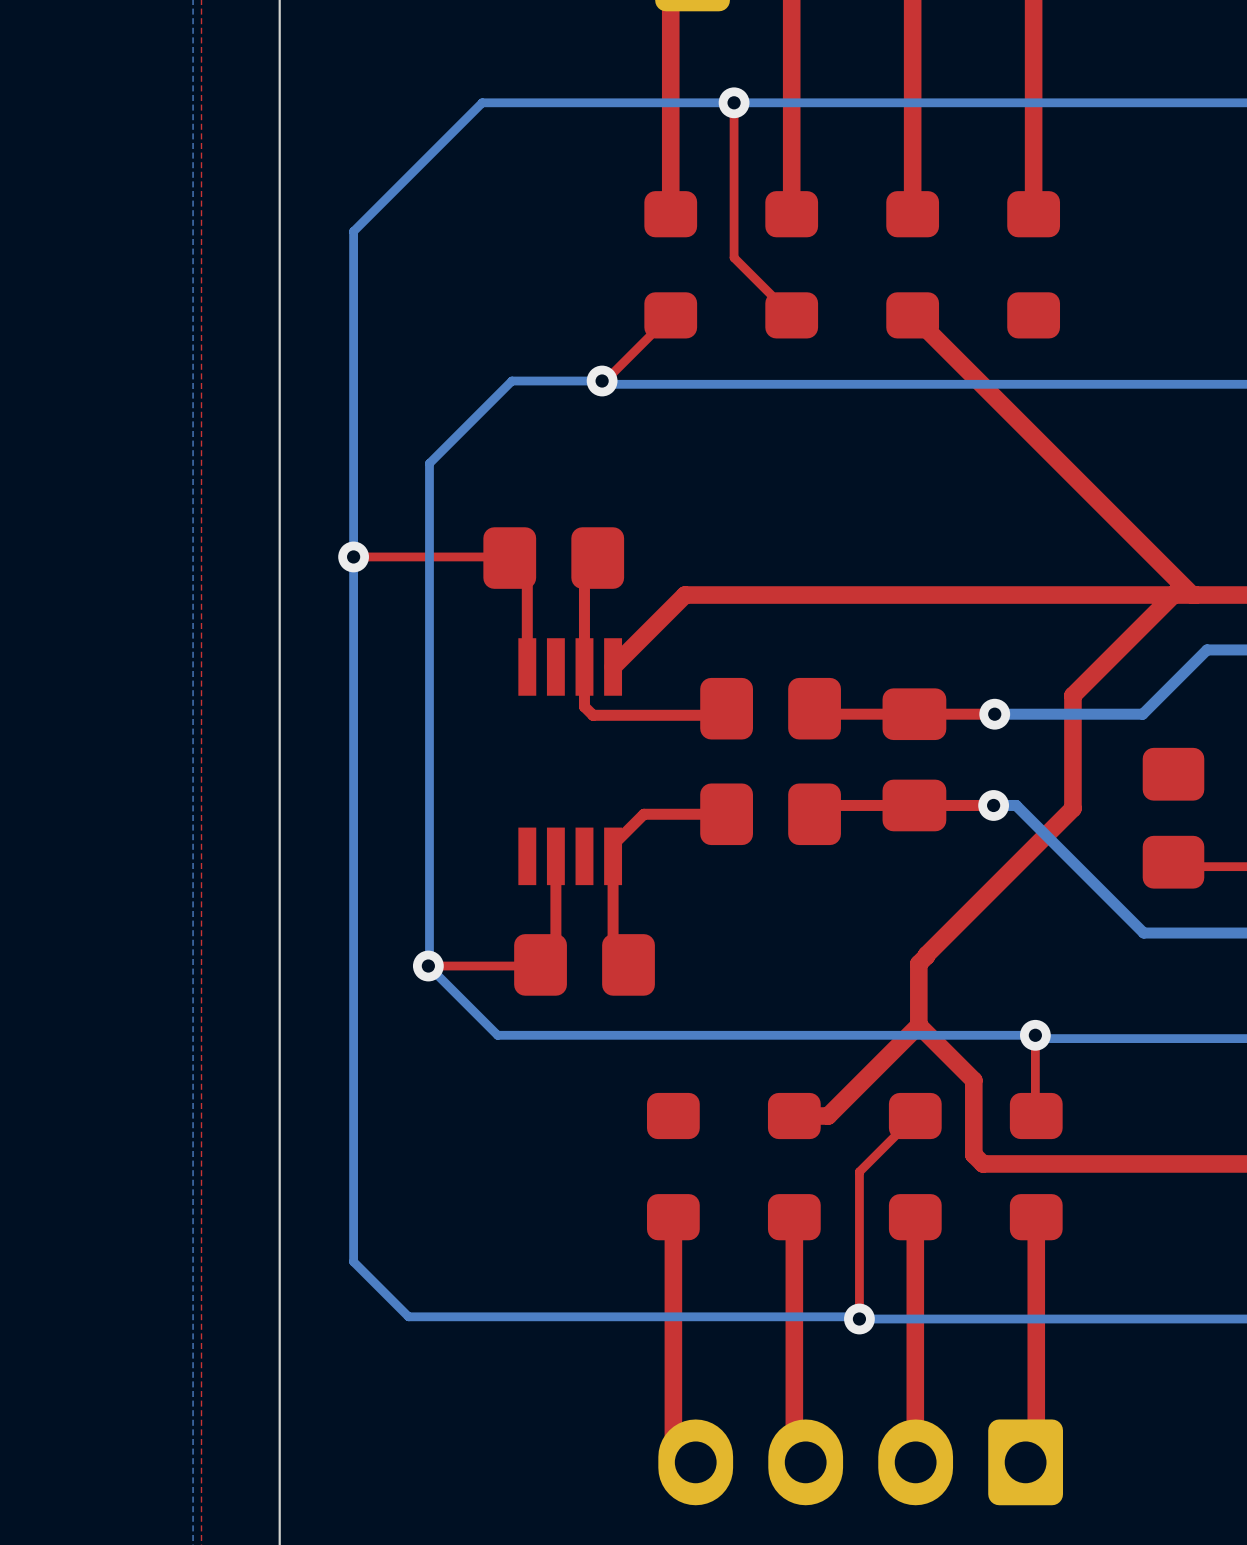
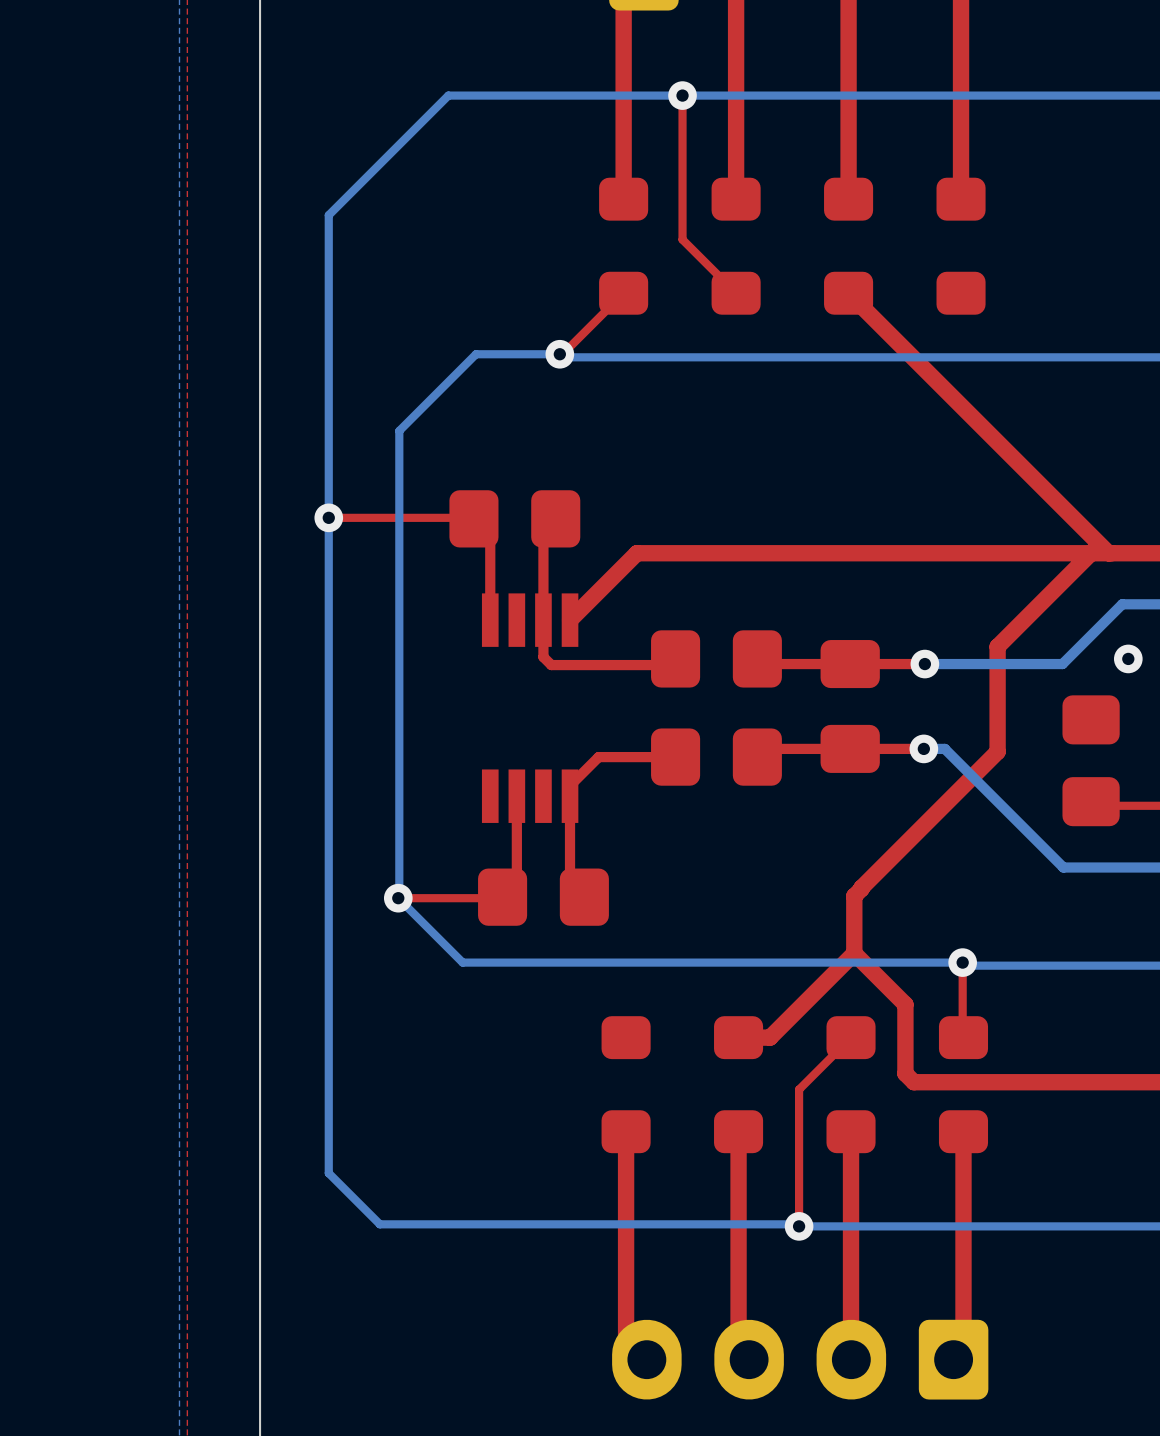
via: none -> (1128, 658)

